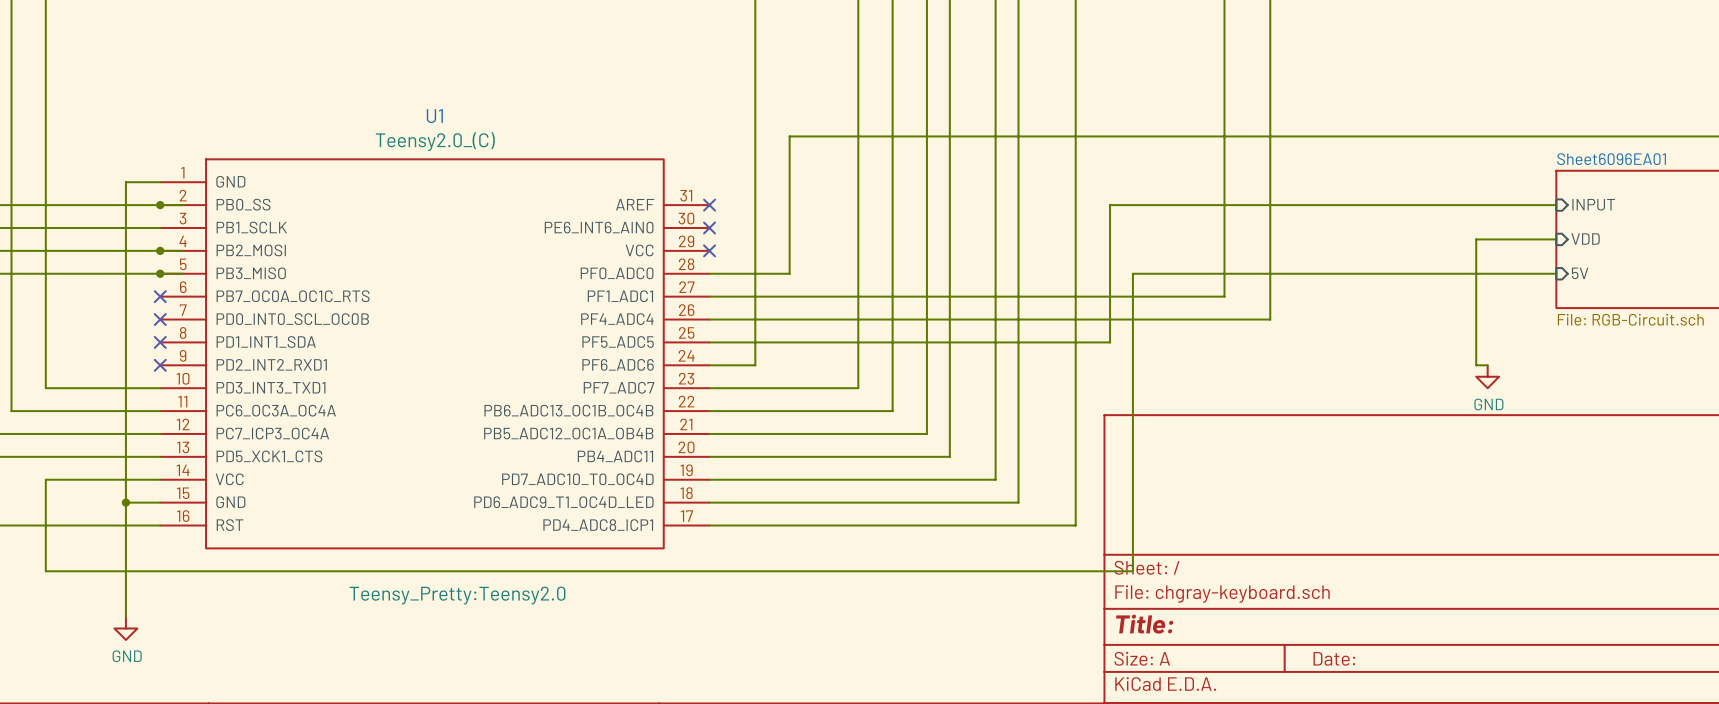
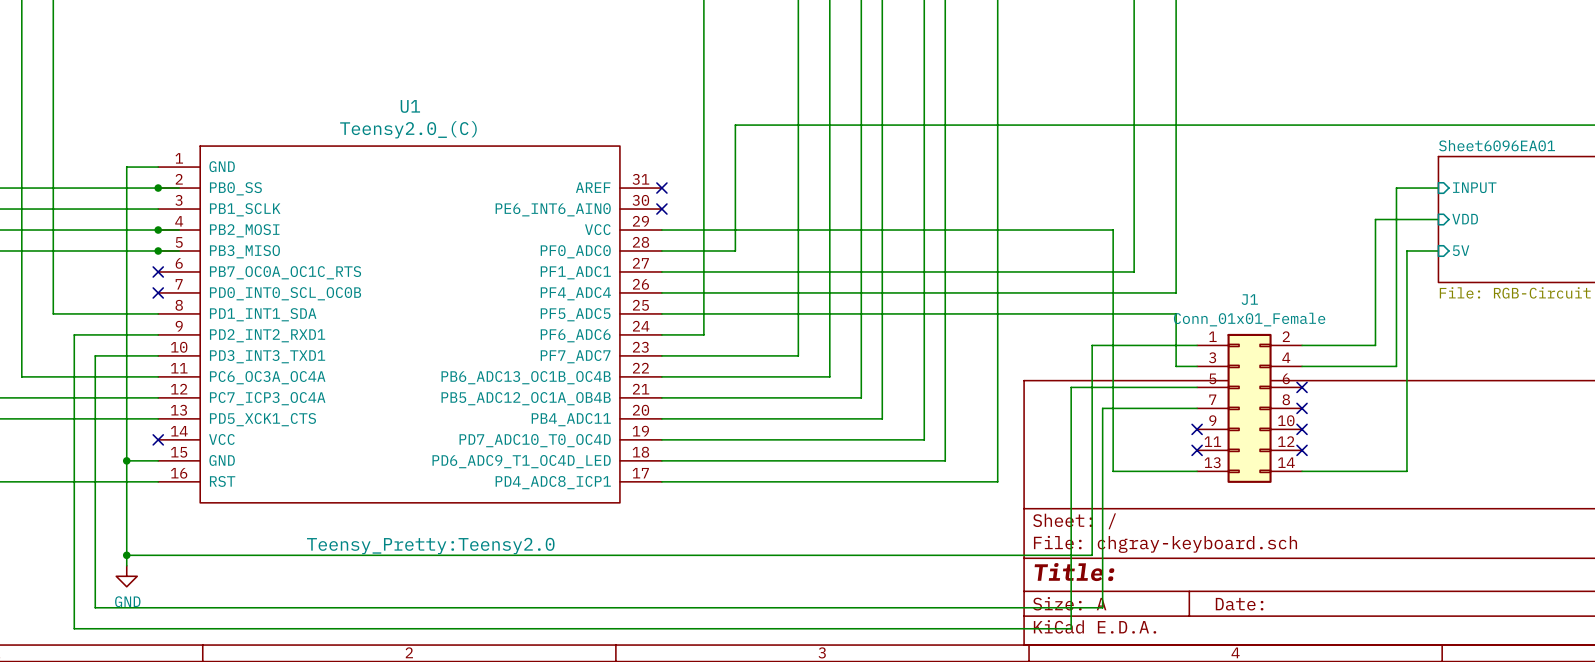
wire: (1510, 205) (1110, 205) (1110, 342) -> (1197, 366) (1176, 366) (1176, 313) (1029, 313)
wire: none -> (1396, 188) (1396, 366) (1302, 366)
wire: (1487, 239) (1476, 239) (1476, 365) (1487, 365) -> (1375, 219) (1375, 345) (1302, 345)
wire: none -> (661, 230) (1113, 230) (1113, 471) (1197, 471)
no-connect mark: (709, 250) -> none
wire: (1522, 273) (1132, 273) (1132, 571) (45, 571) (45, 479) (160, 479) -> (1406, 250) (1406, 471) (1302, 471)
wire: (45, 342) (45, 388) (91, 388) -> (53, 313) (158, 313)
no-connect mark: (160, 342) -> none
wire: none -> (158, 334) (74, 334) (74, 628) (1071, 628) (1071, 387) (1197, 387)
no-connect mark: (160, 365) -> none
wire: none -> (1197, 345) (1092, 345) (1092, 555) (126, 555)
power symbol: GND (1487, 376) -> none
wire: none -> (95, 355) (95, 607) (1102, 607) (1102, 408) (1197, 408)
no-connect mark: none -> (1302, 387)
J1: none -> Conn_01x01_Female (1249, 408)
no-connect mark: none -> (1302, 408)
no-connect mark: none -> (1197, 429)
no-connect mark: none -> (1302, 429)
no-connect mark: none -> (158, 439)
no-connect mark: none -> (1197, 450)
no-connect mark: none -> (1302, 450)
junction: none -> (126, 555)

